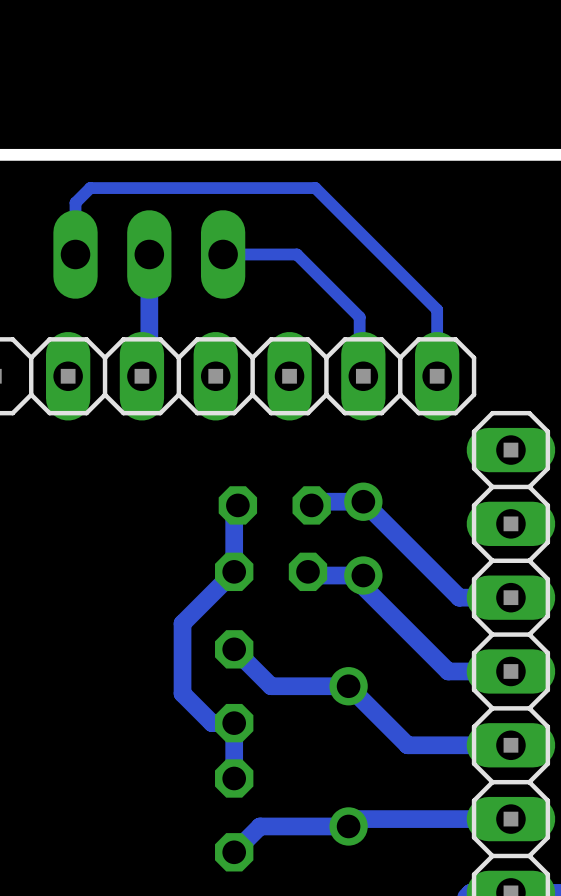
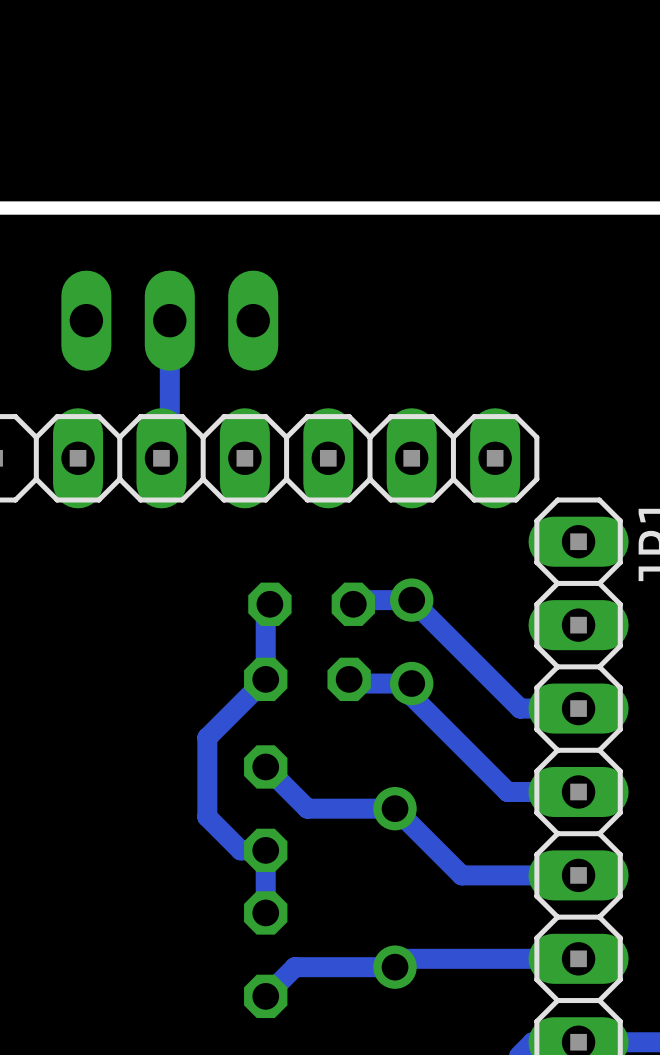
bottom track: (75, 254) (75, 202) (90, 188) (315, 188) (437, 309) (437, 376) -> none
bottom track: (223, 254) (296, 254) (359, 317) (359, 372) (363, 376) -> none

